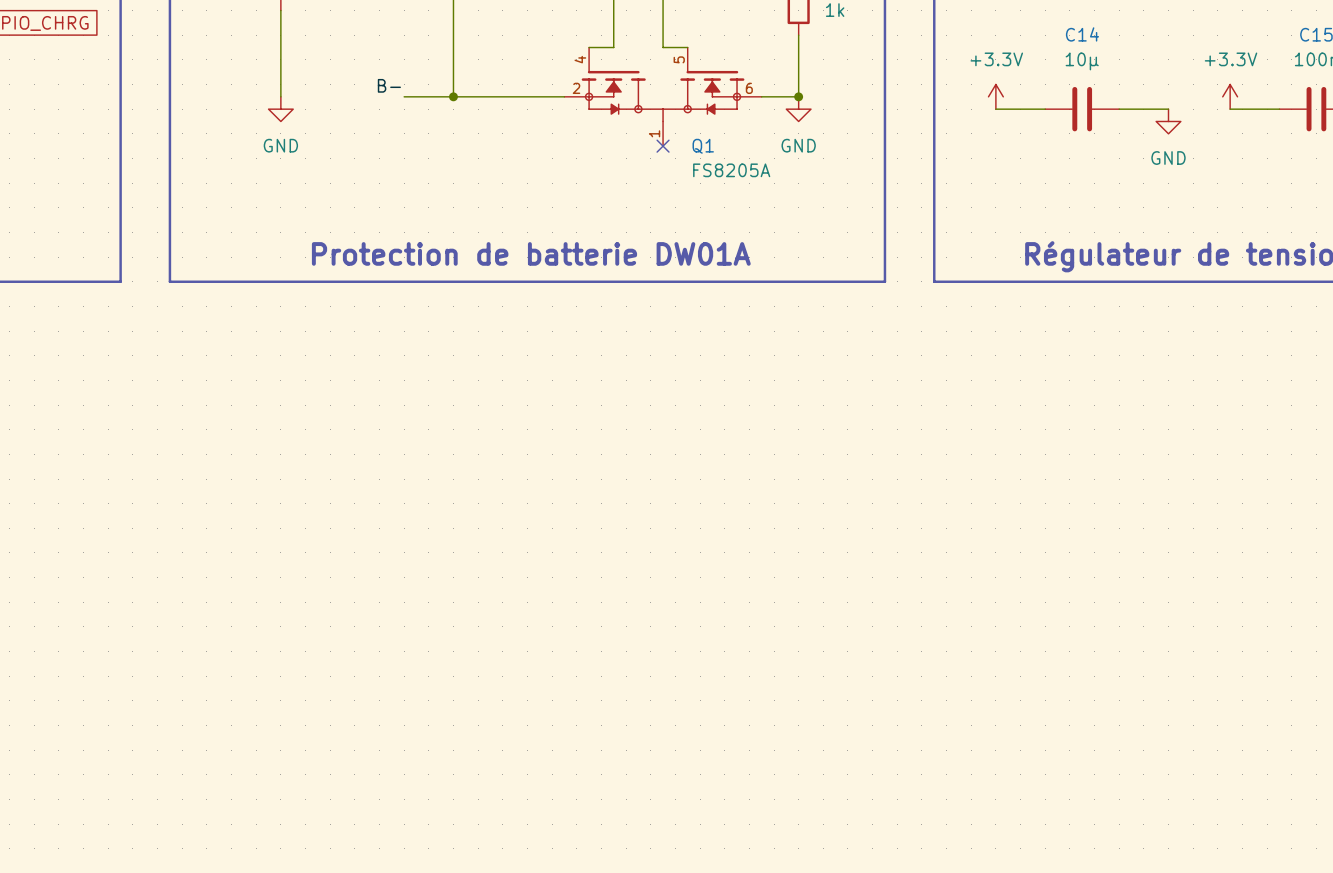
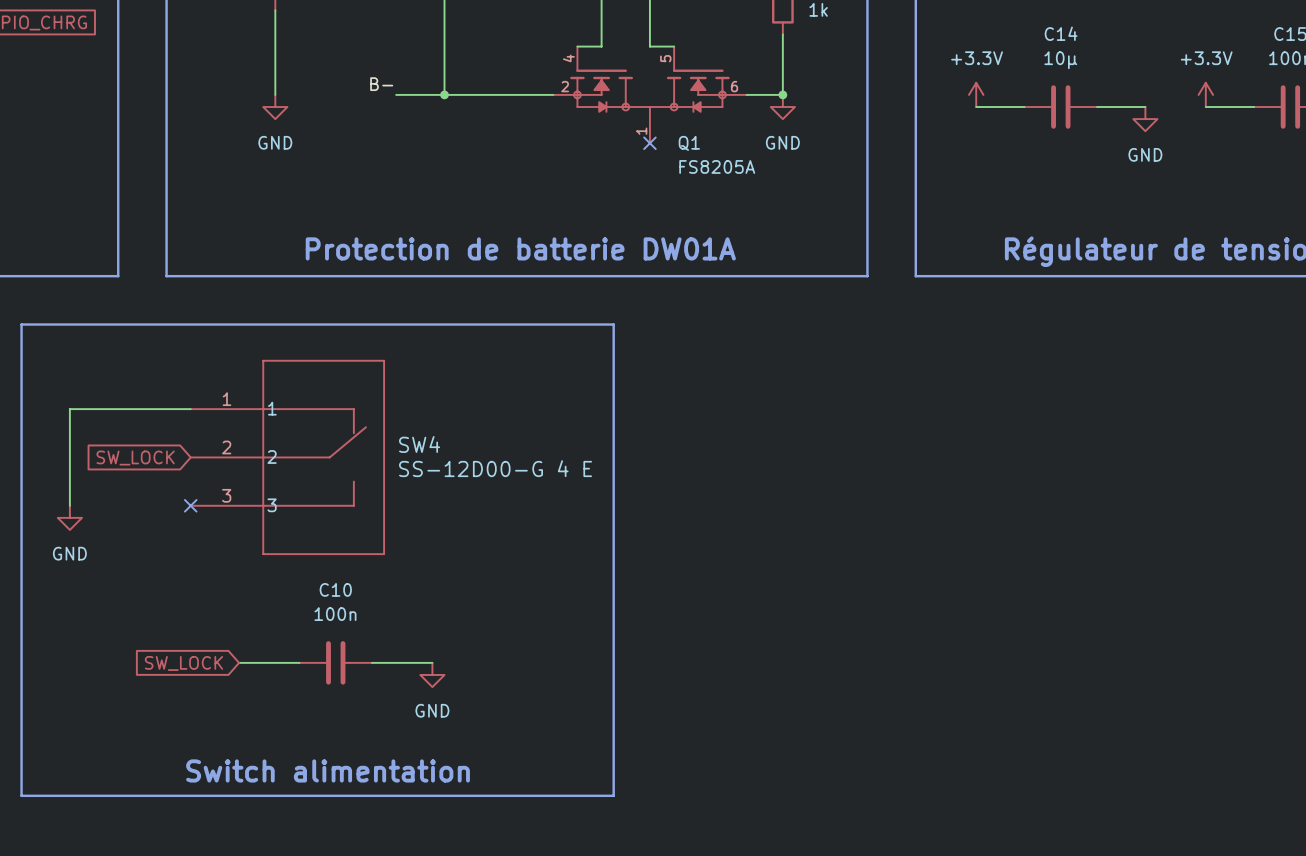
line: none -> (21, 324) (613, 324) (613, 795) (21, 795) (21, 324)
wire: none -> (190, 409) (69, 409) (69, 505)
SW4: none -> SS-12D00-G 4 E (287, 457)
global label: none -> SW_LOCK (135, 458)
no-connect mark: none -> (190, 505)
power symbol: none -> GND (69, 517)
global label: none -> SW_LOCK (183, 663)
wire: none -> (239, 662) (299, 662)
C10: none -> 100n (335, 662)
wire: none -> (372, 662) (432, 662)
power symbol: none -> GND (432, 674)
text: none -> Switch alimentation (328, 770)

